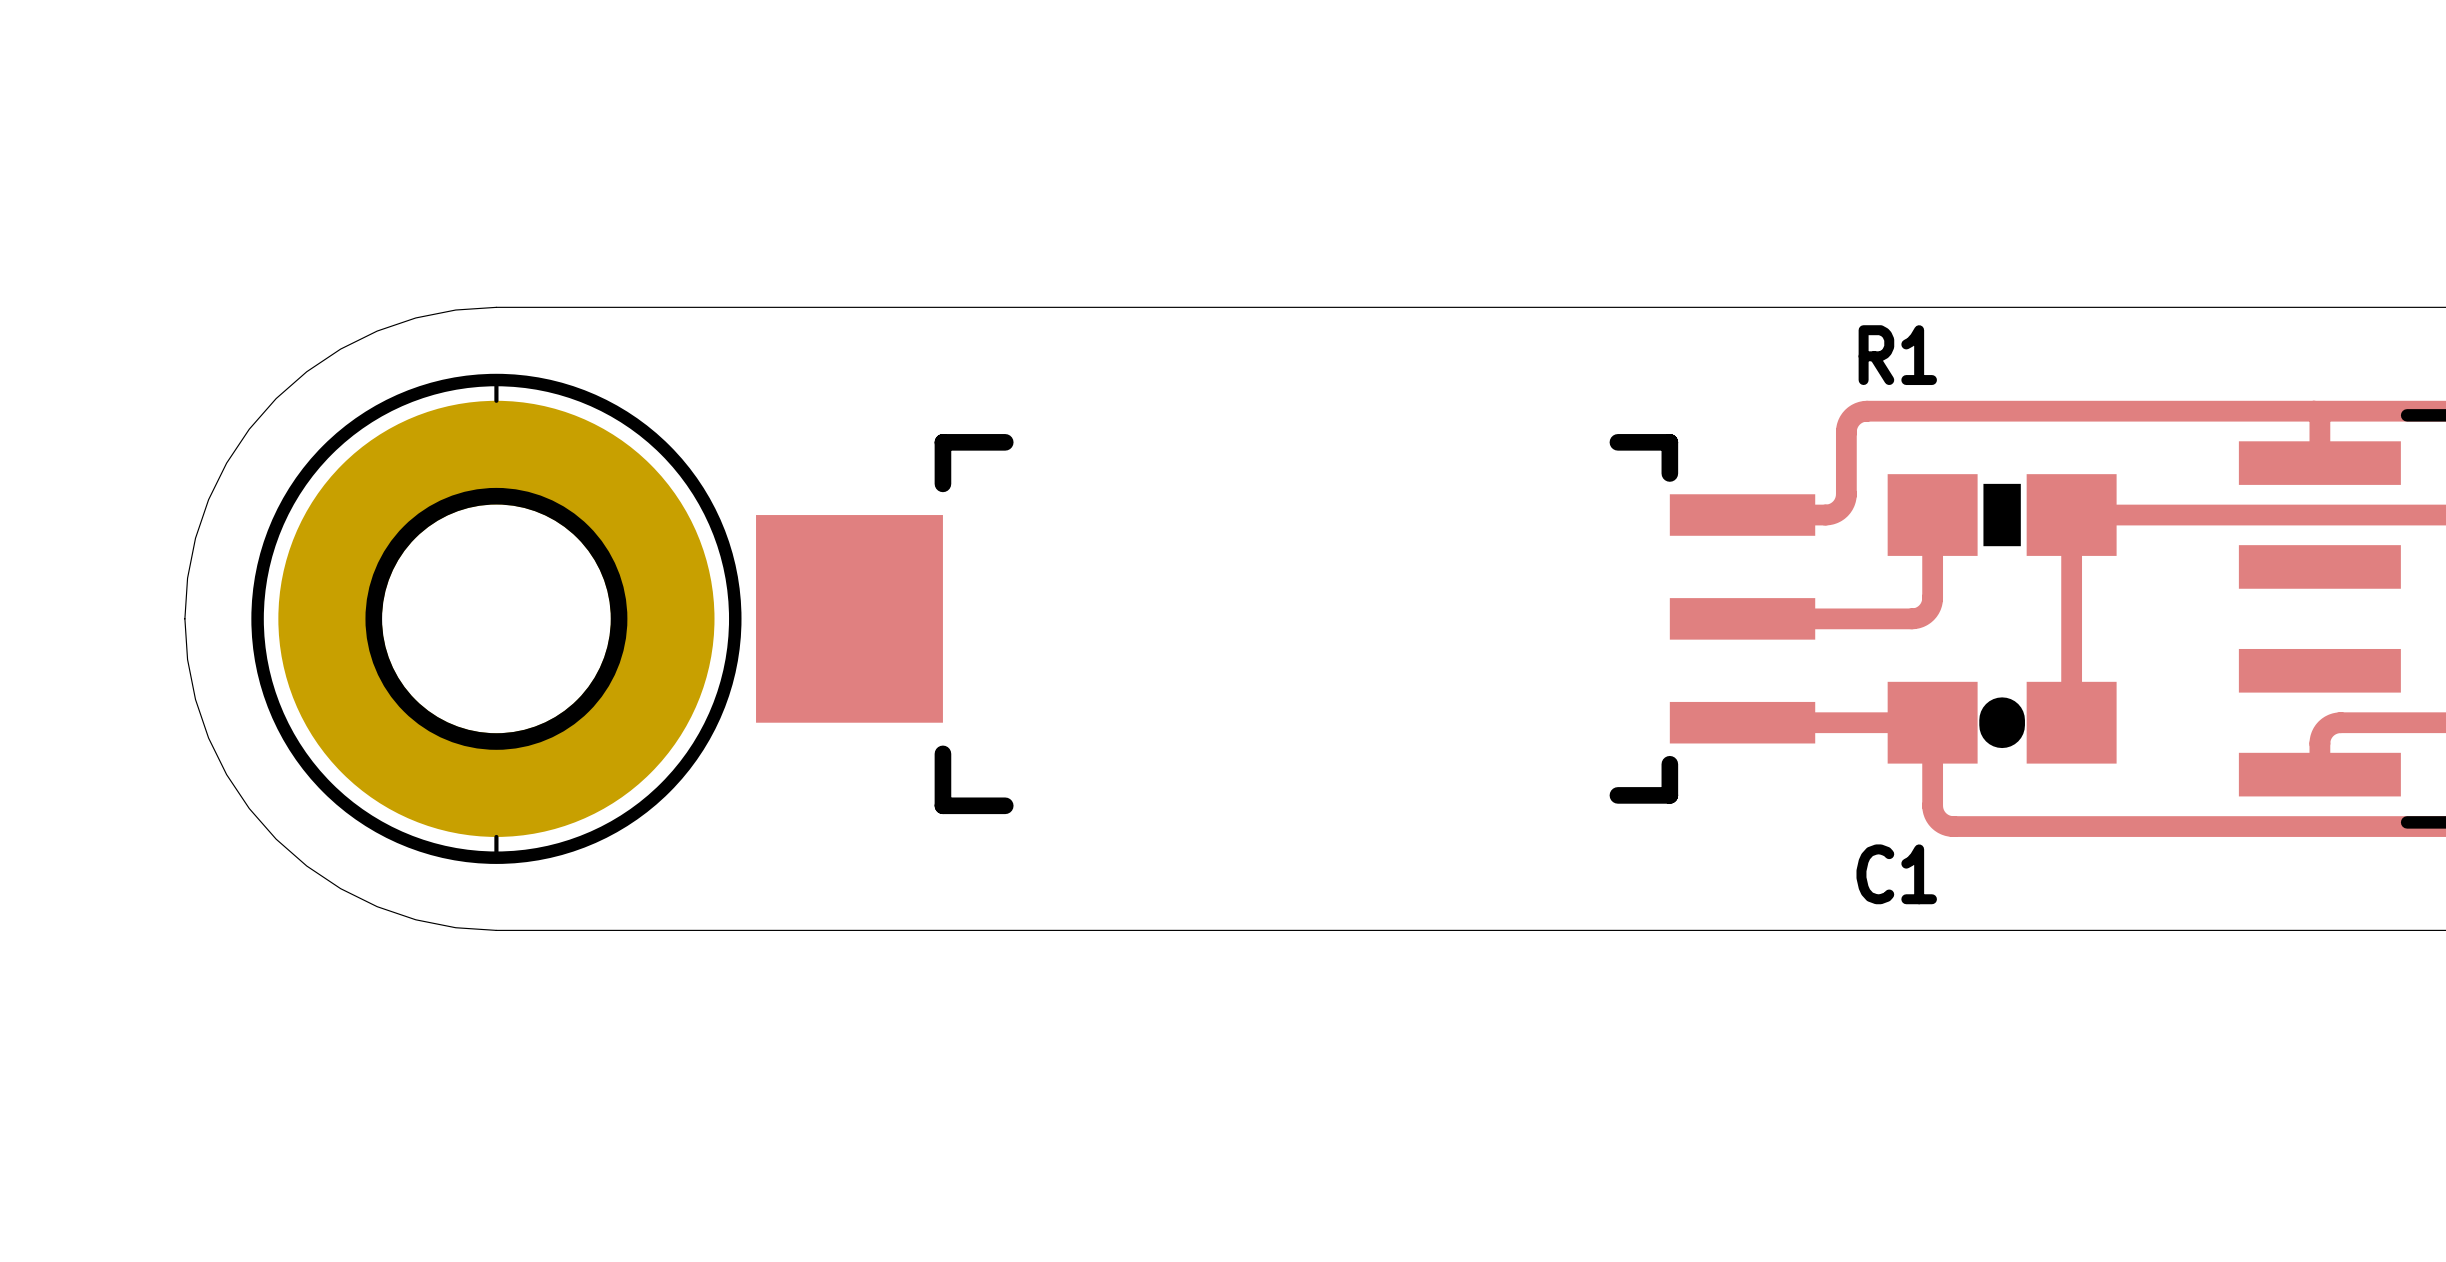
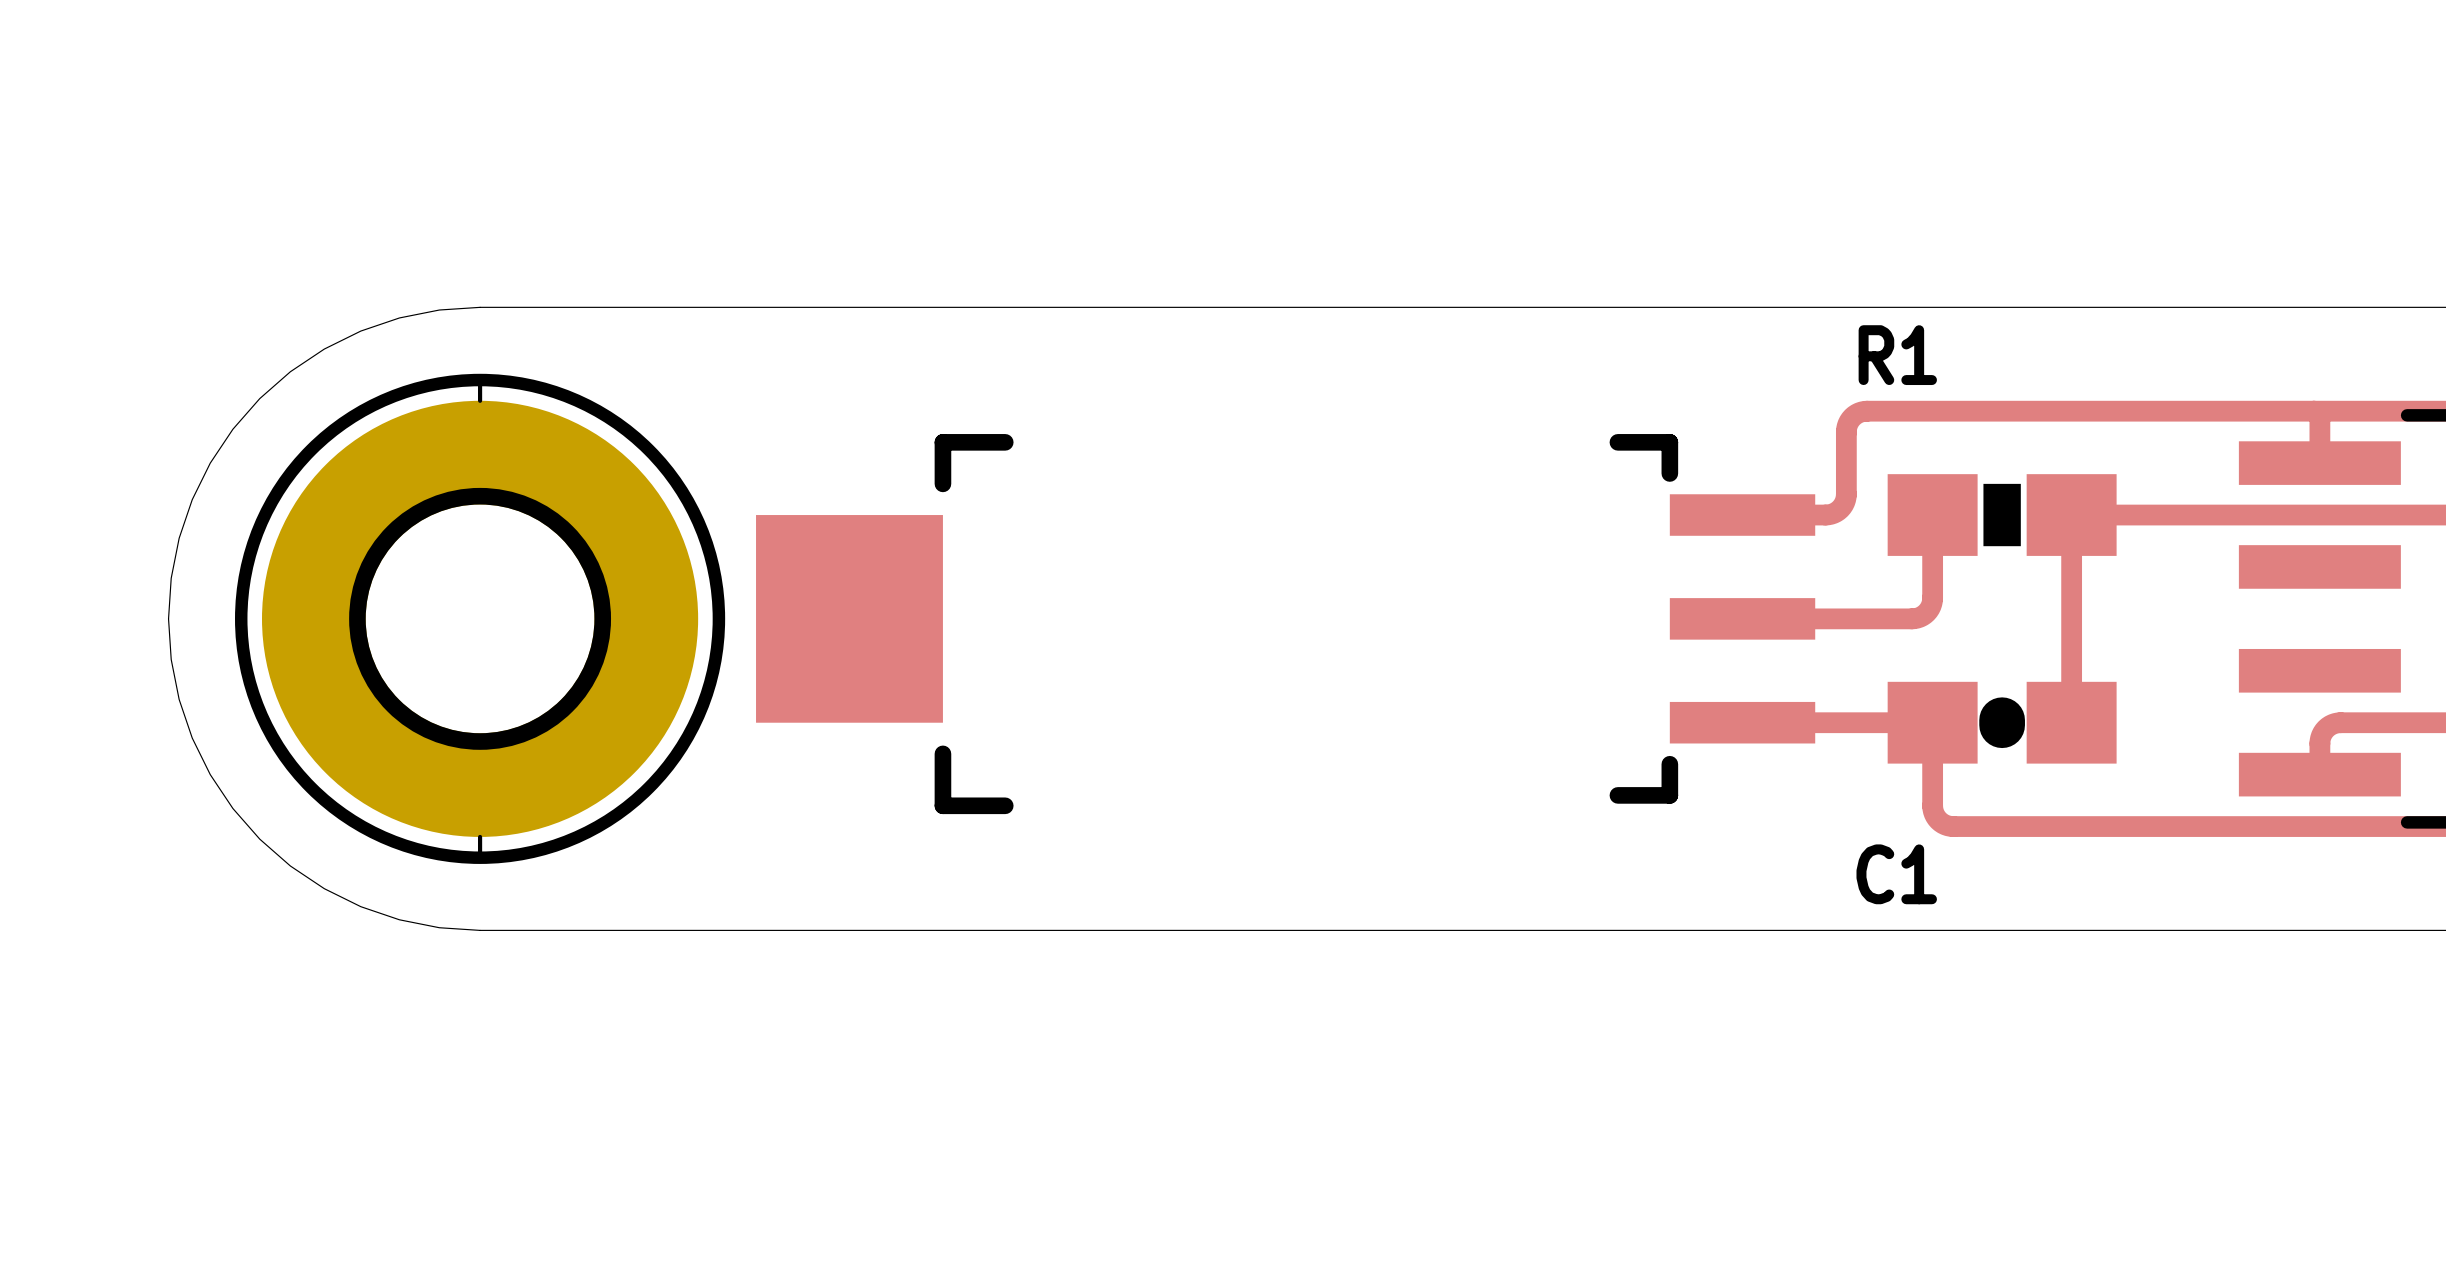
board edge: (496, 307) (455, 310) (415, 317) (377, 331) (340, 349) (306, 371) (276, 398) (249, 429) (226, 463) (208, 499) (195, 538) (187, 578) (184, 618) (187, 659) (195, 699) (208, 738) (226, 774) (249, 808) (276, 839) (306, 866) (340, 888) (377, 906) (415, 919) (455, 927) (496, 930) -> (496, 307) (439, 310) (399, 317) (360, 331) (324, 349) (290, 371) (259, 398) (232, 429) (210, 463) (192, 499) (179, 538) (171, 578) (168, 618) (171, 659) (179, 699) (192, 738) (210, 774) (232, 808) (259, 839) (290, 866) (324, 888) (360, 906) (399, 919) (439, 927) (496, 930)
part position: (496, 618) -> (480, 618)

